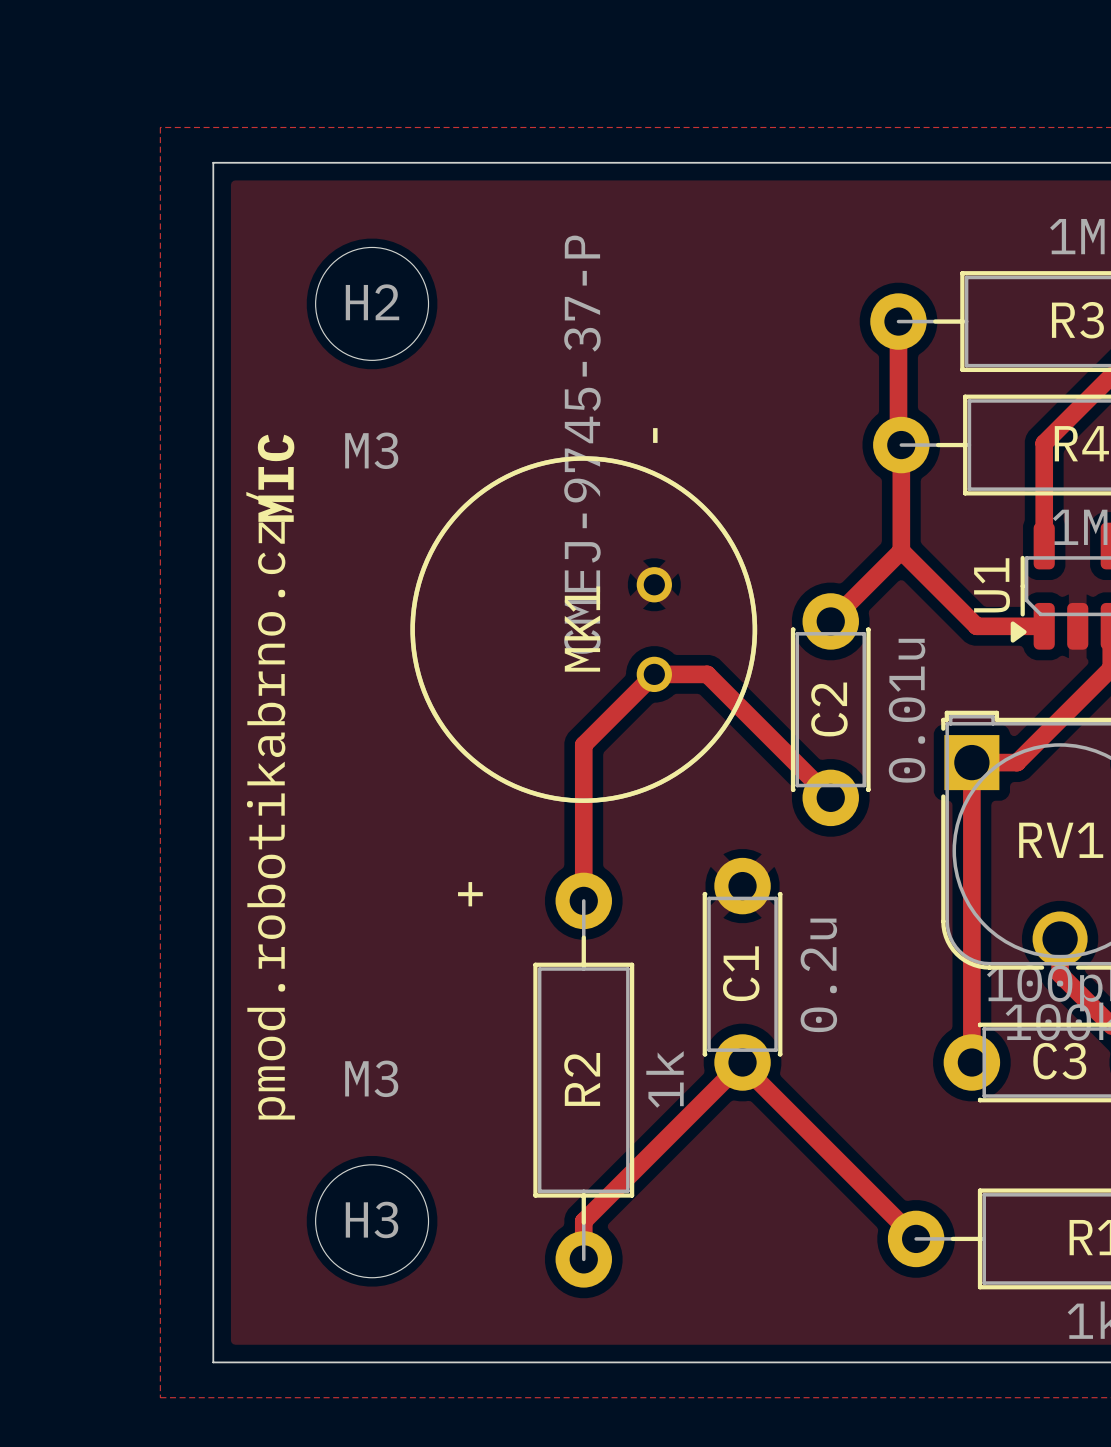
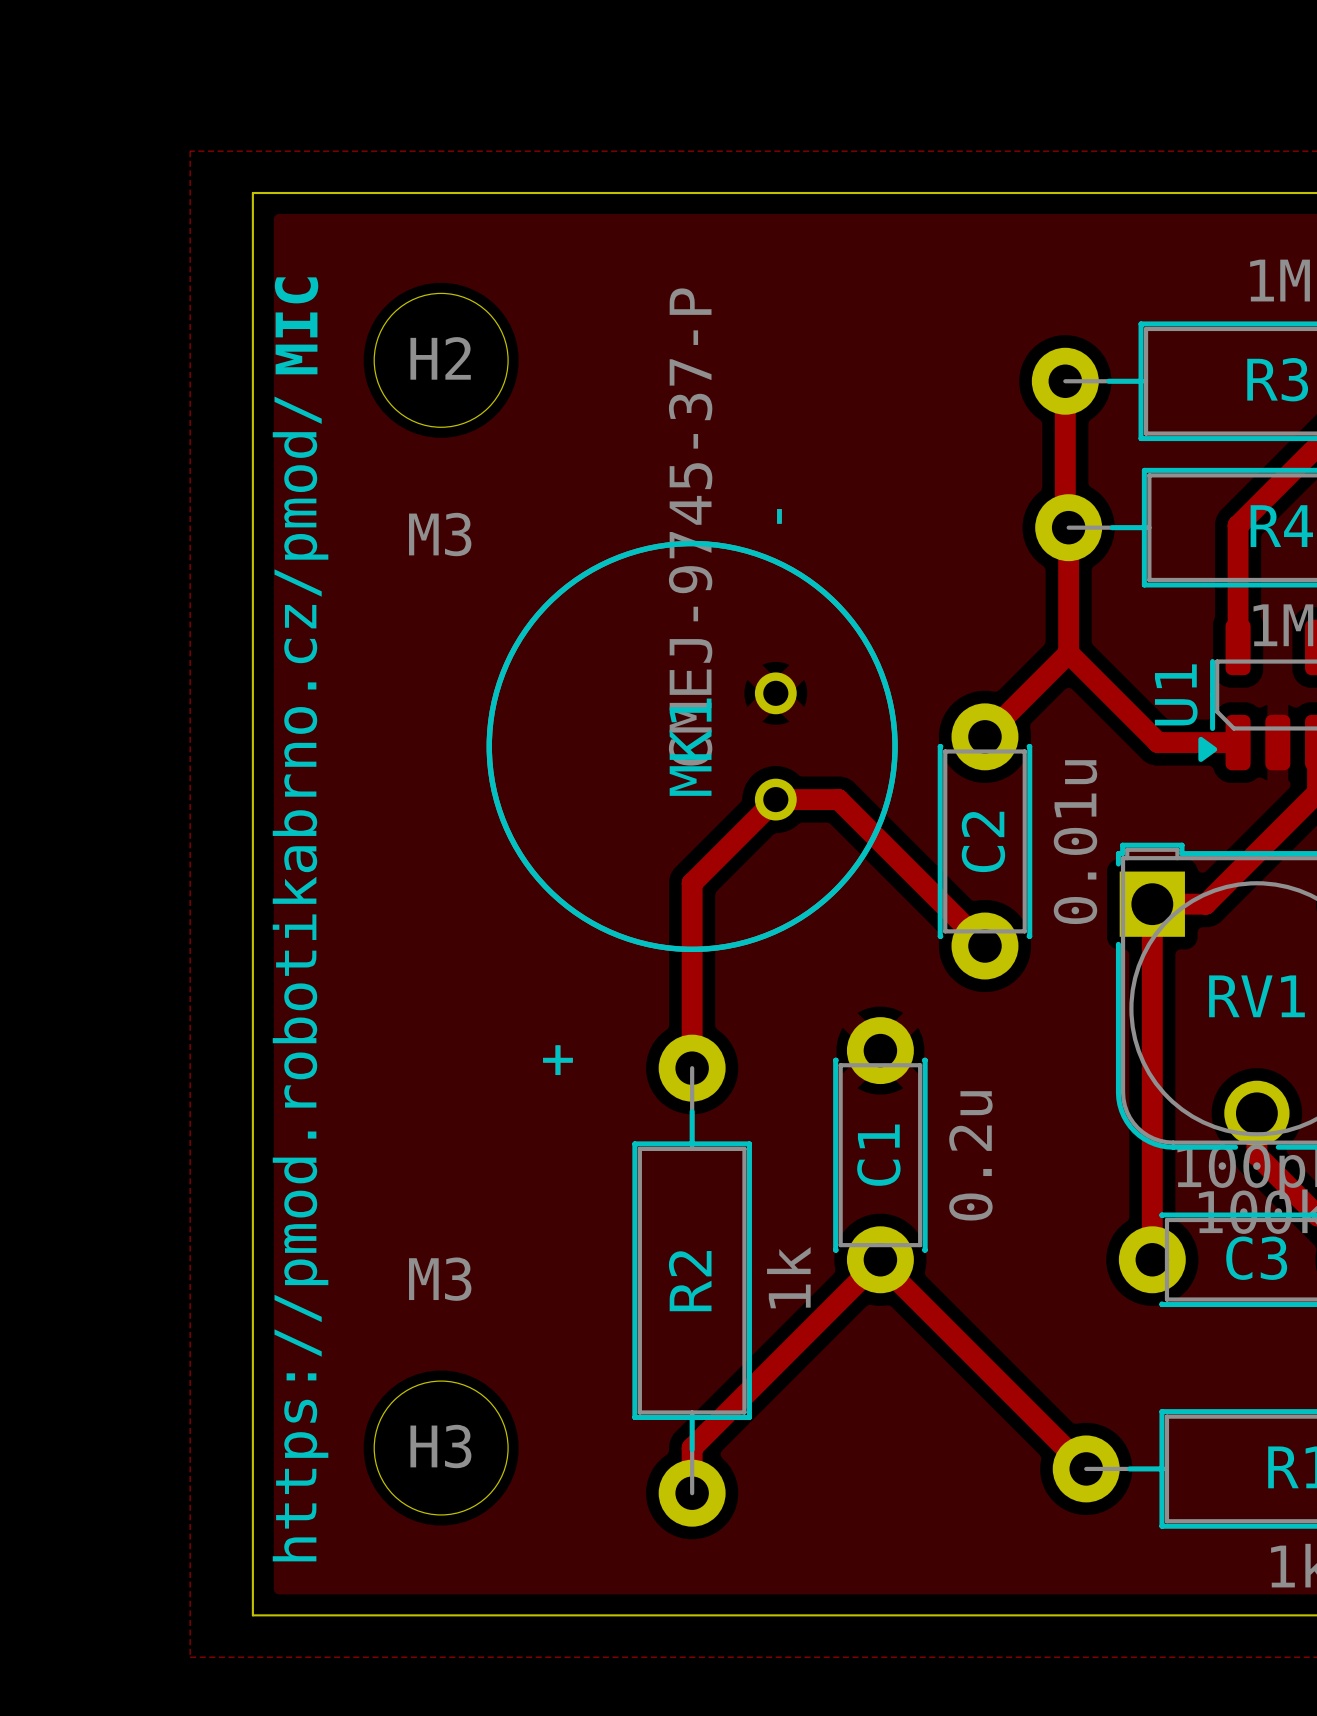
text position: MIC (276, 478) -> MIC (296, 325)
text: pmod.robotikabrno.cz/ (270, 805) -> https://pmod.robotikabrno.cz/pmod/ (300, 978)

